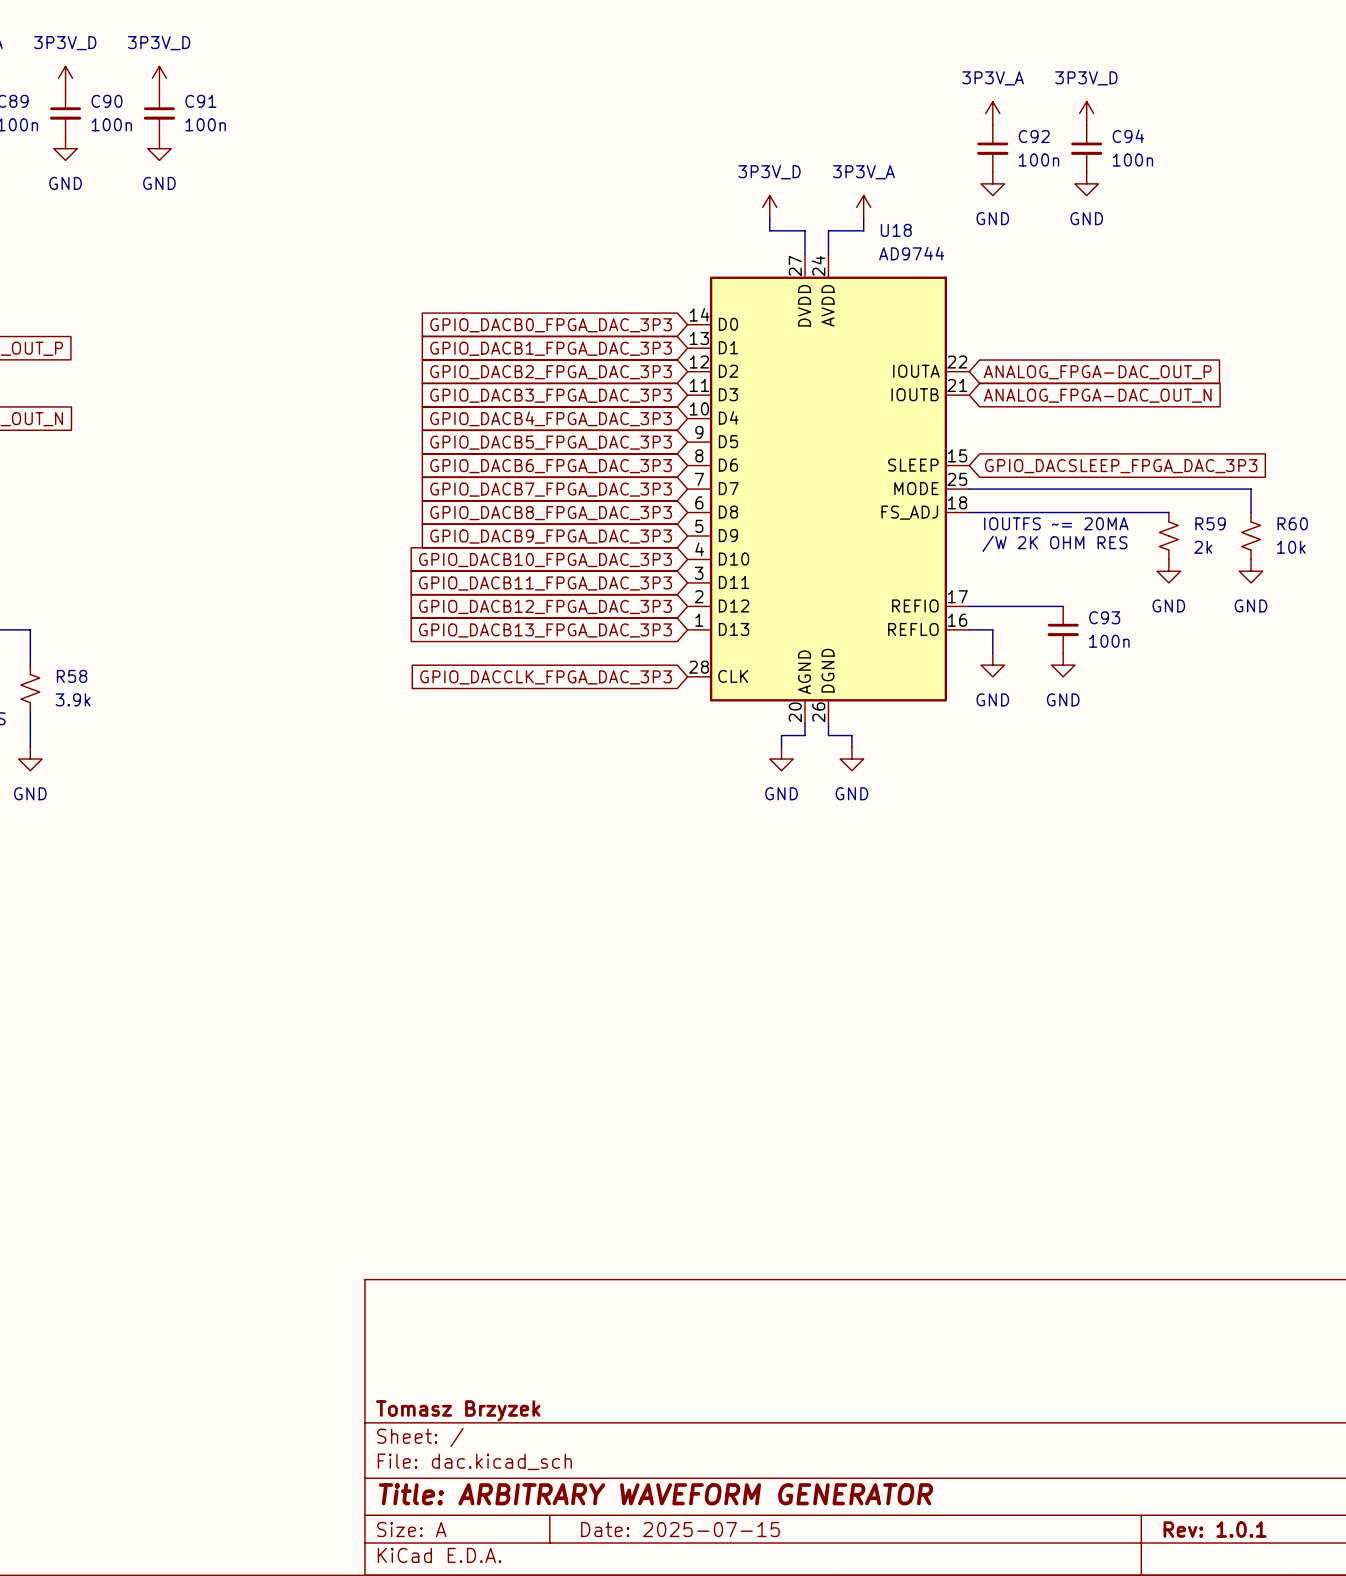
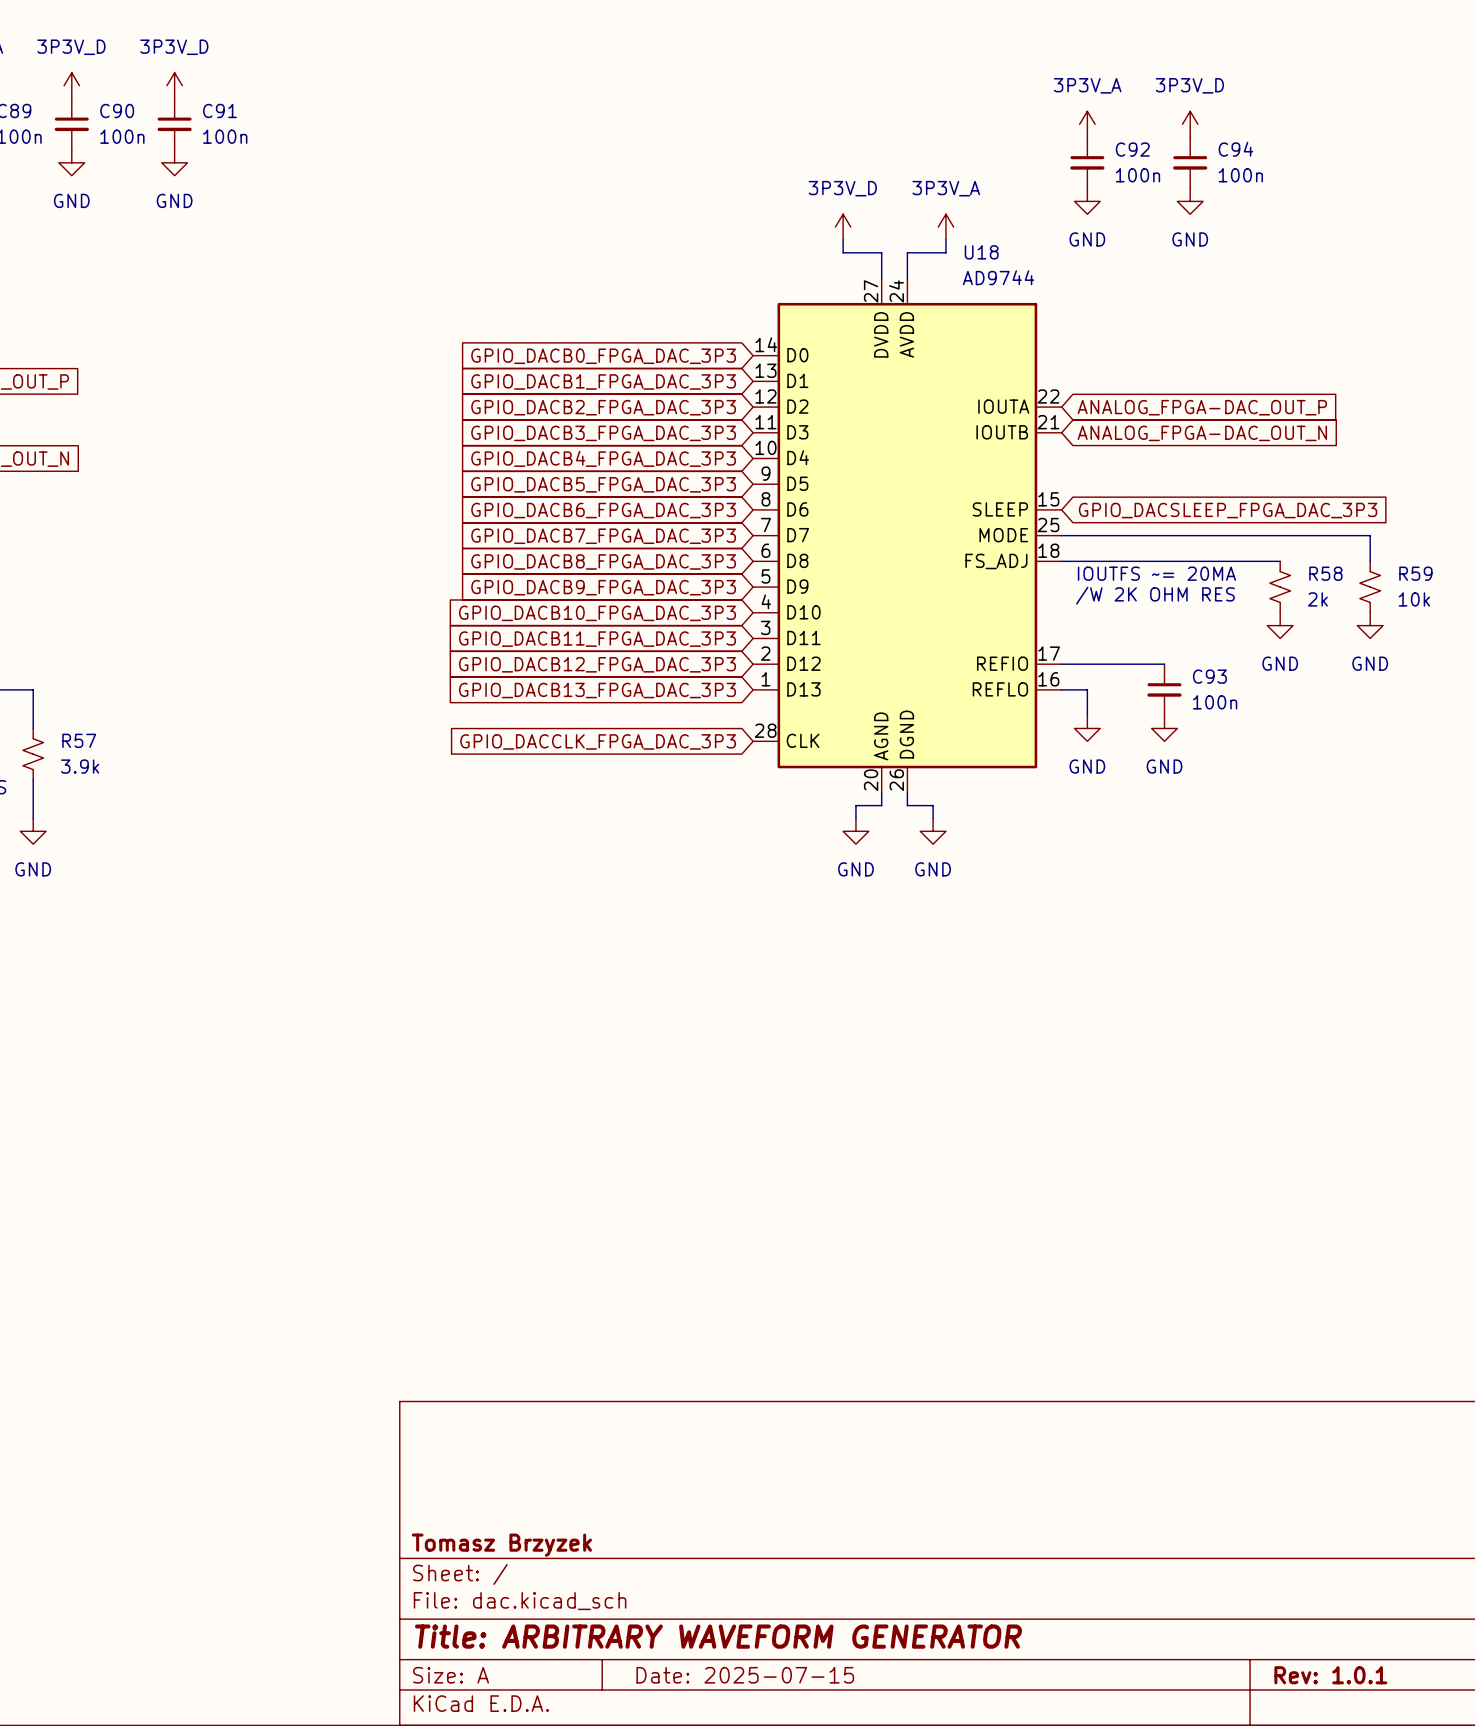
R59 name: R59 (1210, 523) -> R58 (1325, 573)
R60 name: R60 (1292, 523) -> R59 (1415, 573)
R58 name: R58 (72, 676) -> R57 (79, 740)

